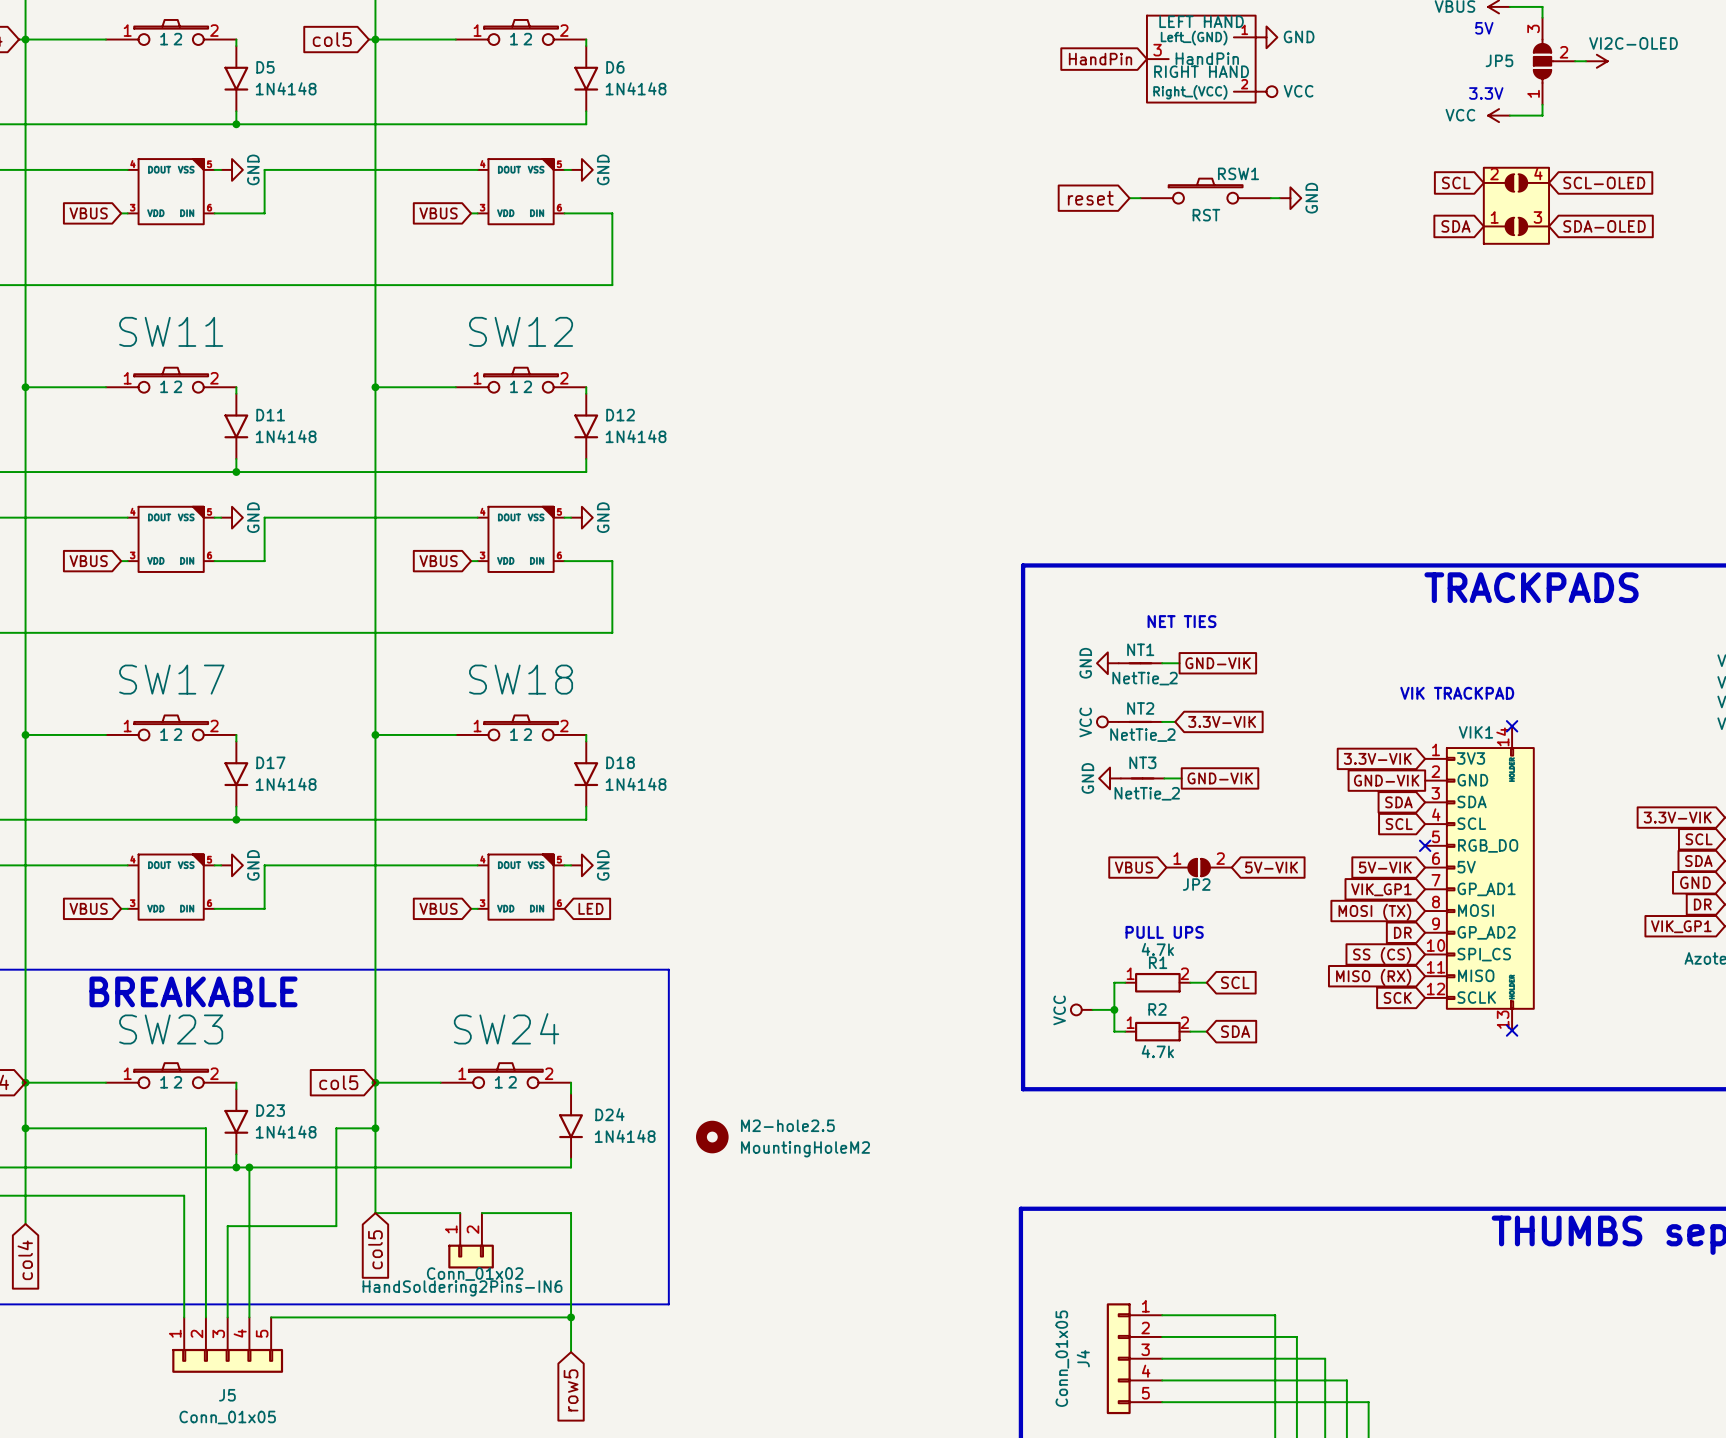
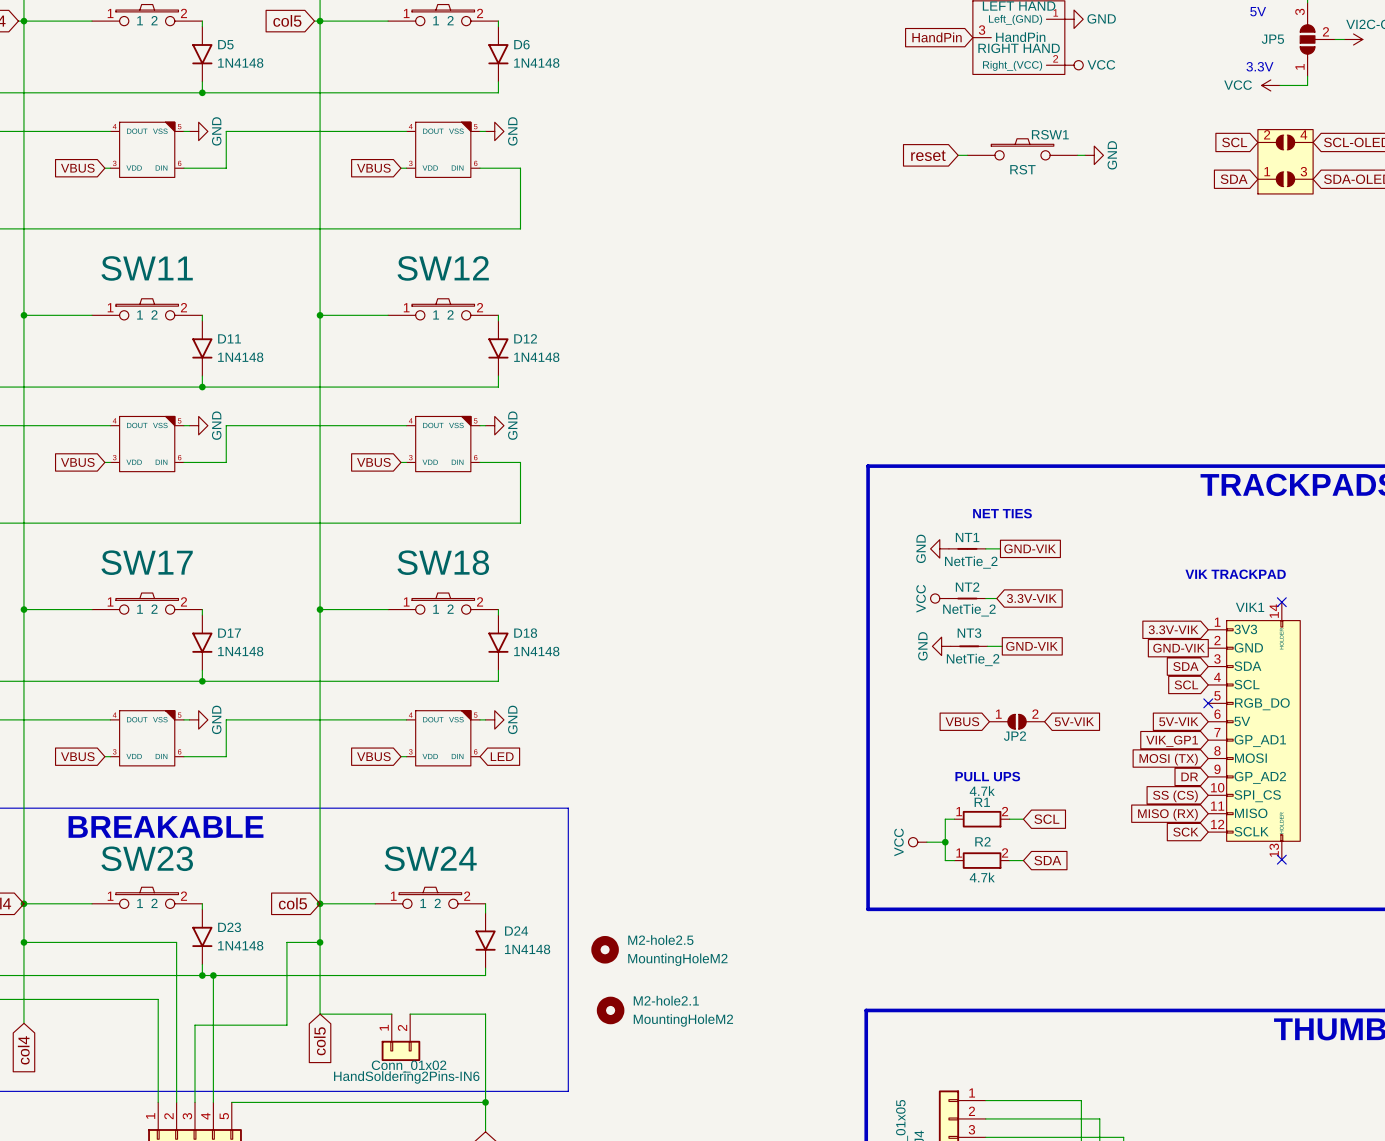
M2-hole2.1: none -> MountingHoleM2 (610, 1010)

